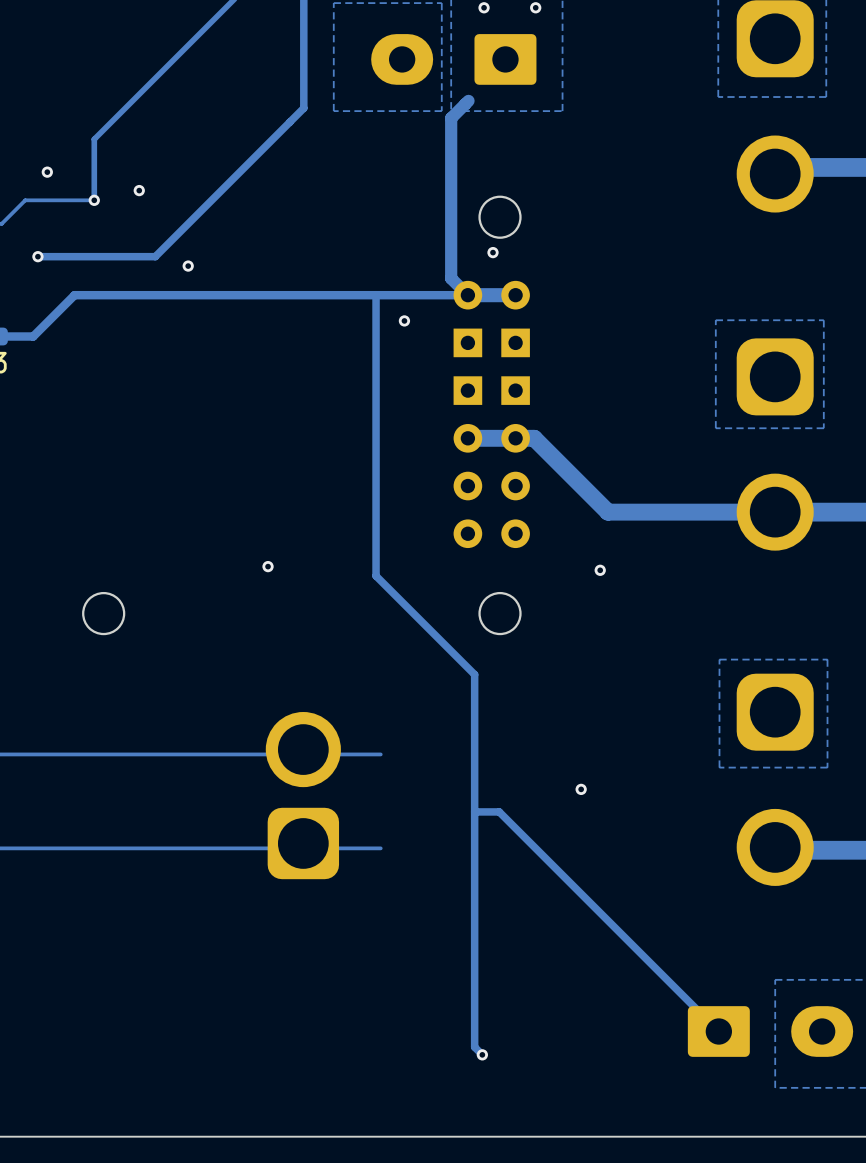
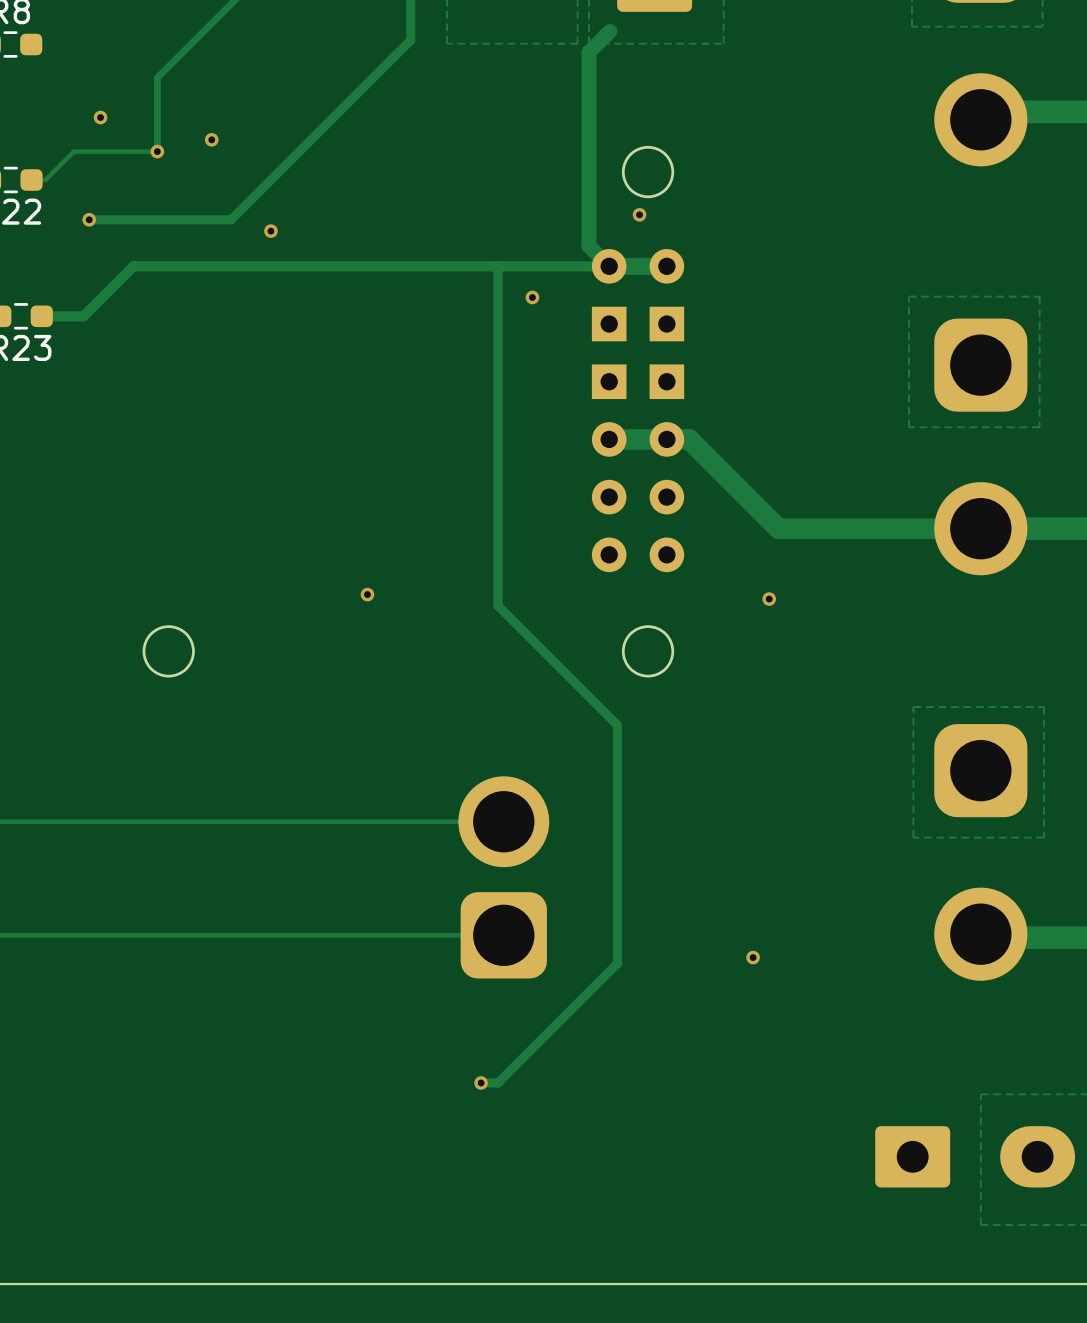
via position: (581, 789) -> (753, 957)
part position: (303, 795) -> (503, 877)
track: (474, 811) (499, 811) (718, 1031) -> none
track: (474, 871) (474, 1047) (482, 1054) -> (617, 963) (498, 1082) (481, 1082)
via: none -> (481, 1082)
via: (482, 1054) -> none

